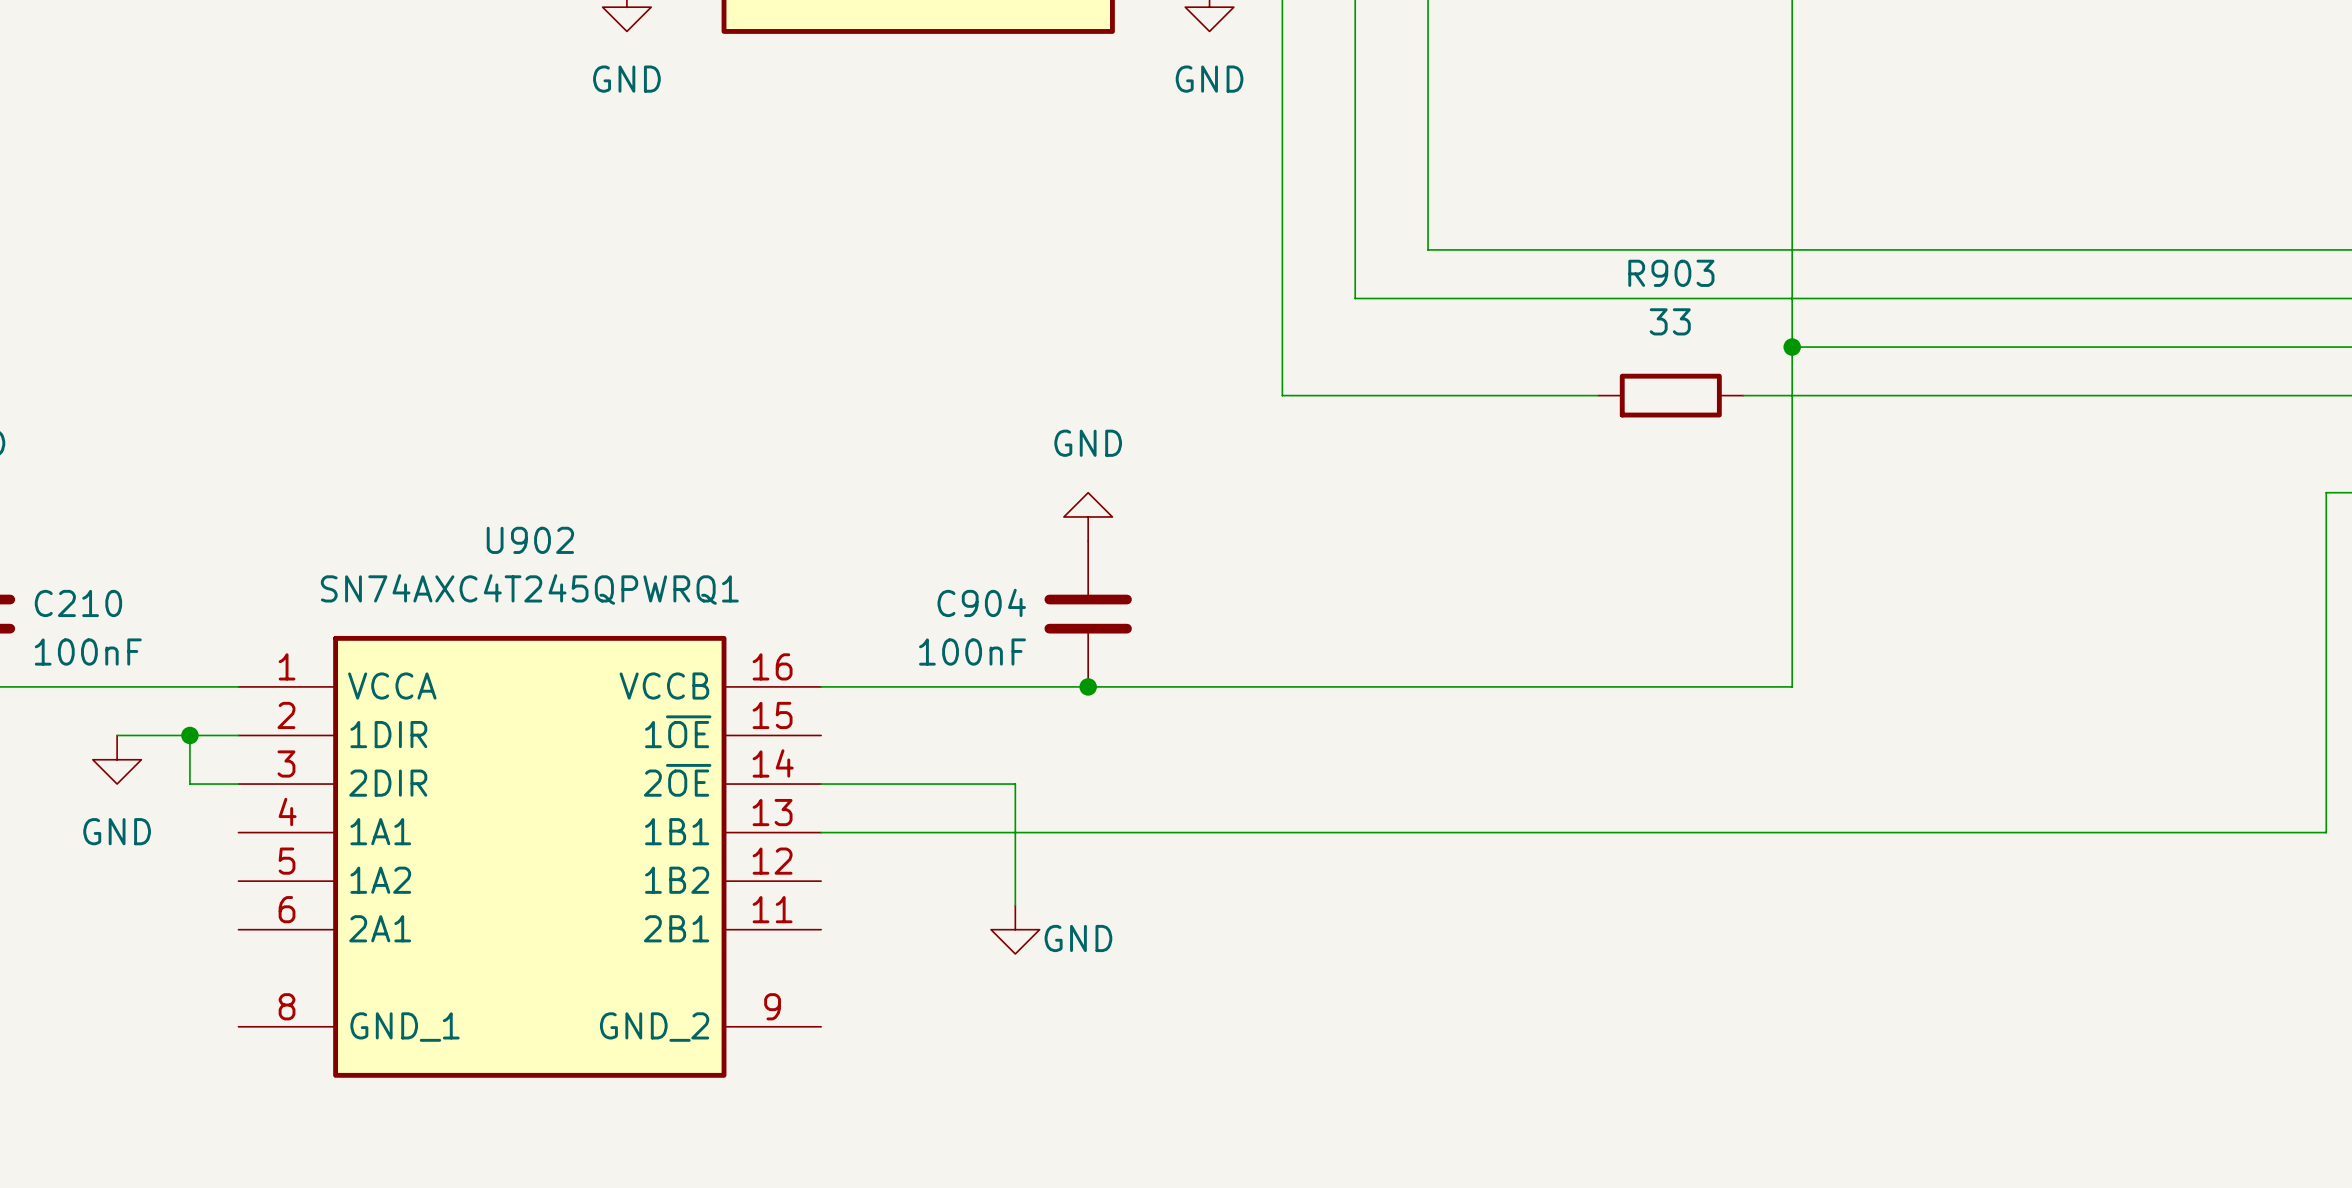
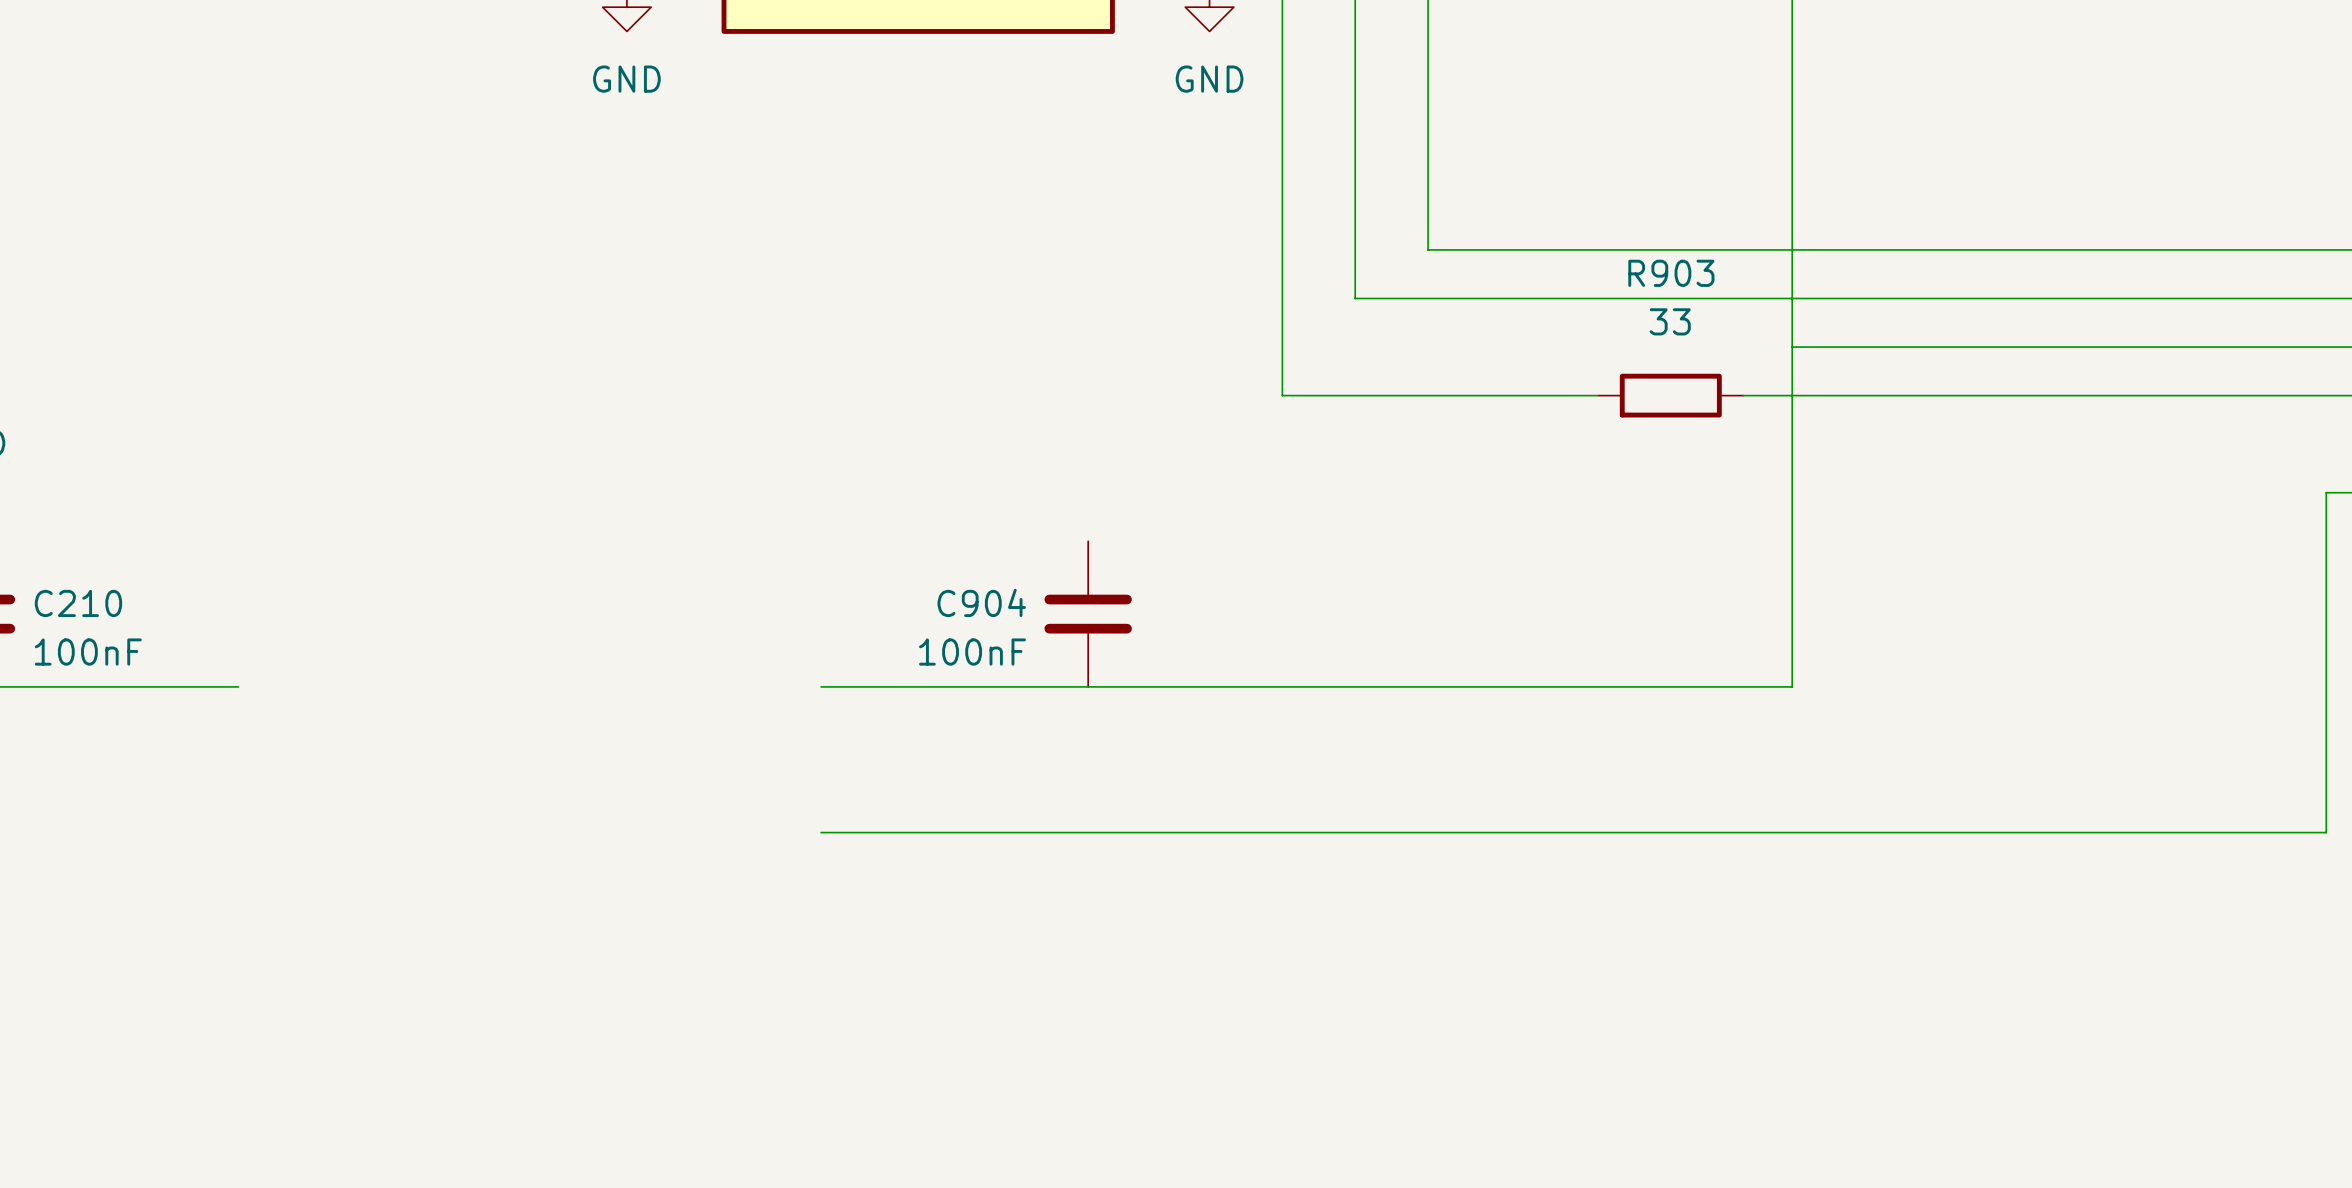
junction: (1792, 347) -> none
power symbol: GND (1088, 516) -> none
junction: (1088, 686) -> none
wire: (117, 735) (238, 735) -> none
wire: (189, 735) (189, 784) (238, 784) -> none
junction: (189, 735) -> none
power symbol: GND (117, 759) -> none
wire: (821, 784) (1015, 784) (1015, 905) -> none
U902: SN74AXC4T245QPWRQ1 (529, 856) -> none
power symbol: GND (1015, 929) -> none

